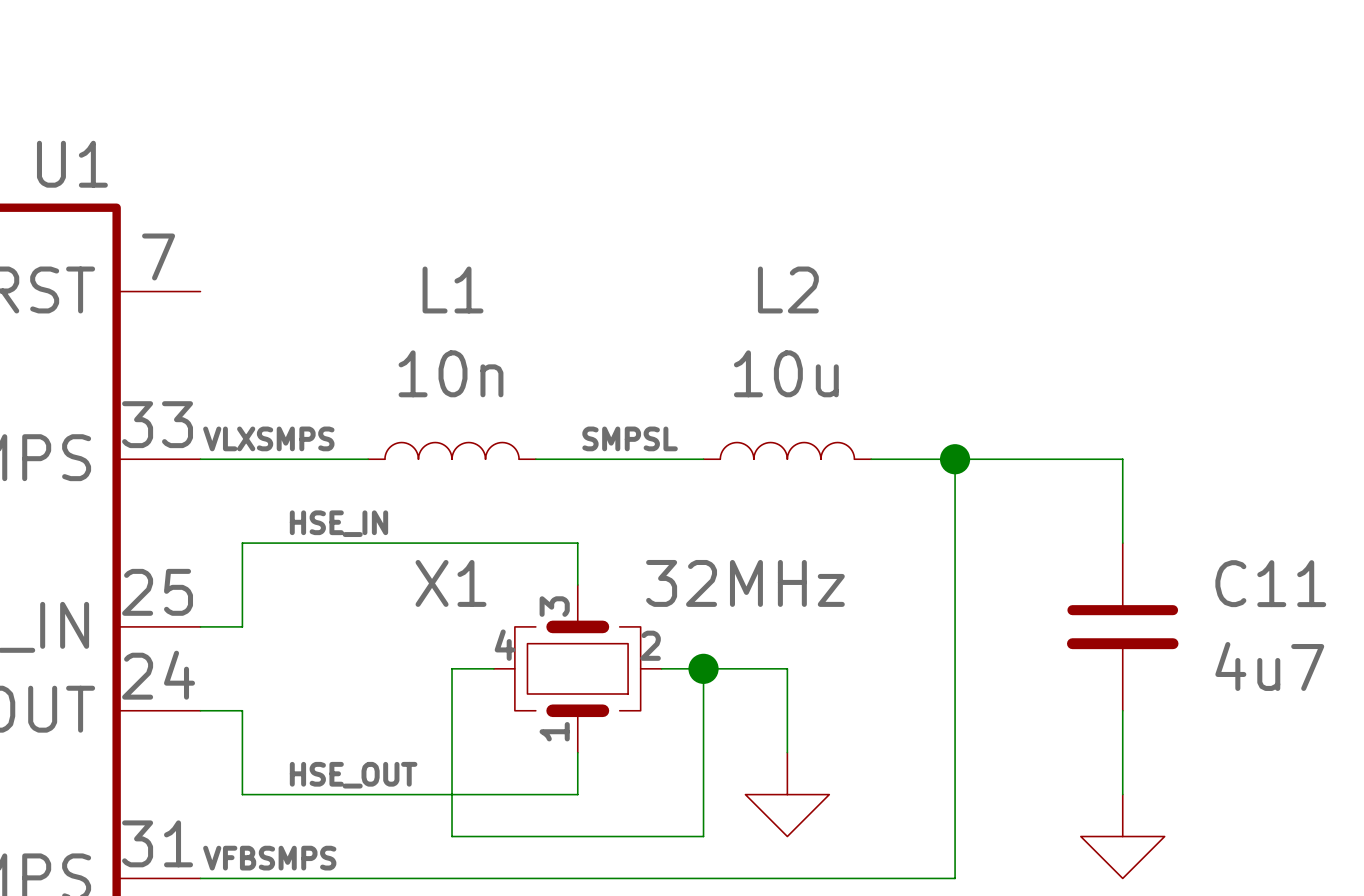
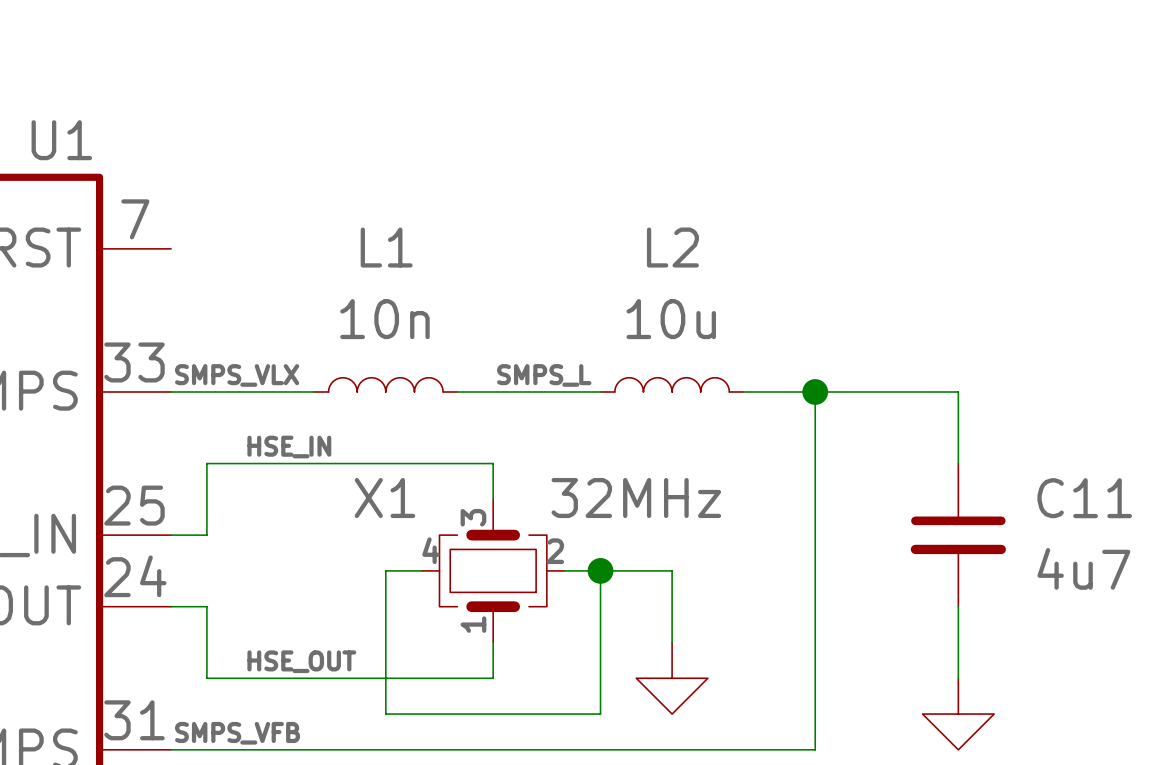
label: VLXSMPS (268, 438) -> SMPS_VLX (237, 375)
label: SMPSL (630, 438) -> SMPS_L (544, 375)
label: VFBSMPS (269, 858) -> SMPS_VFB (237, 733)

